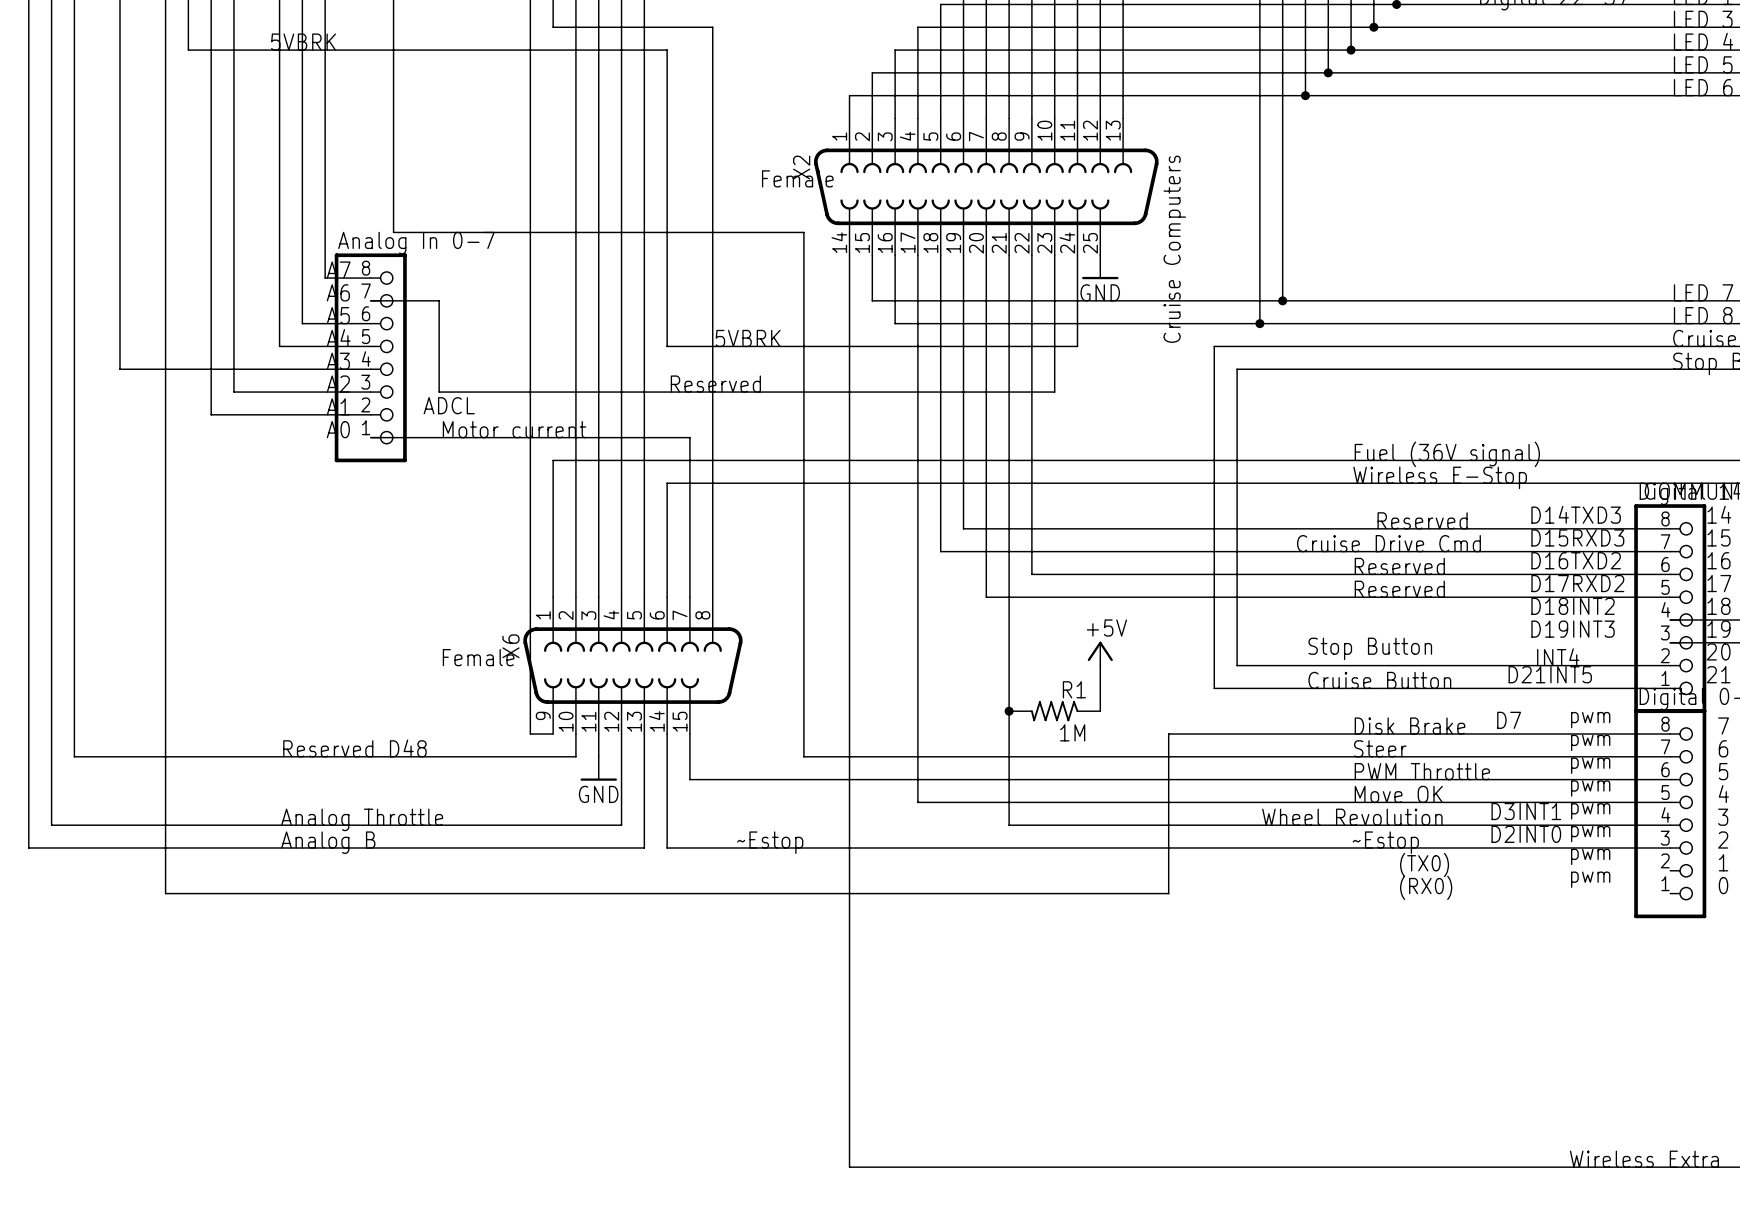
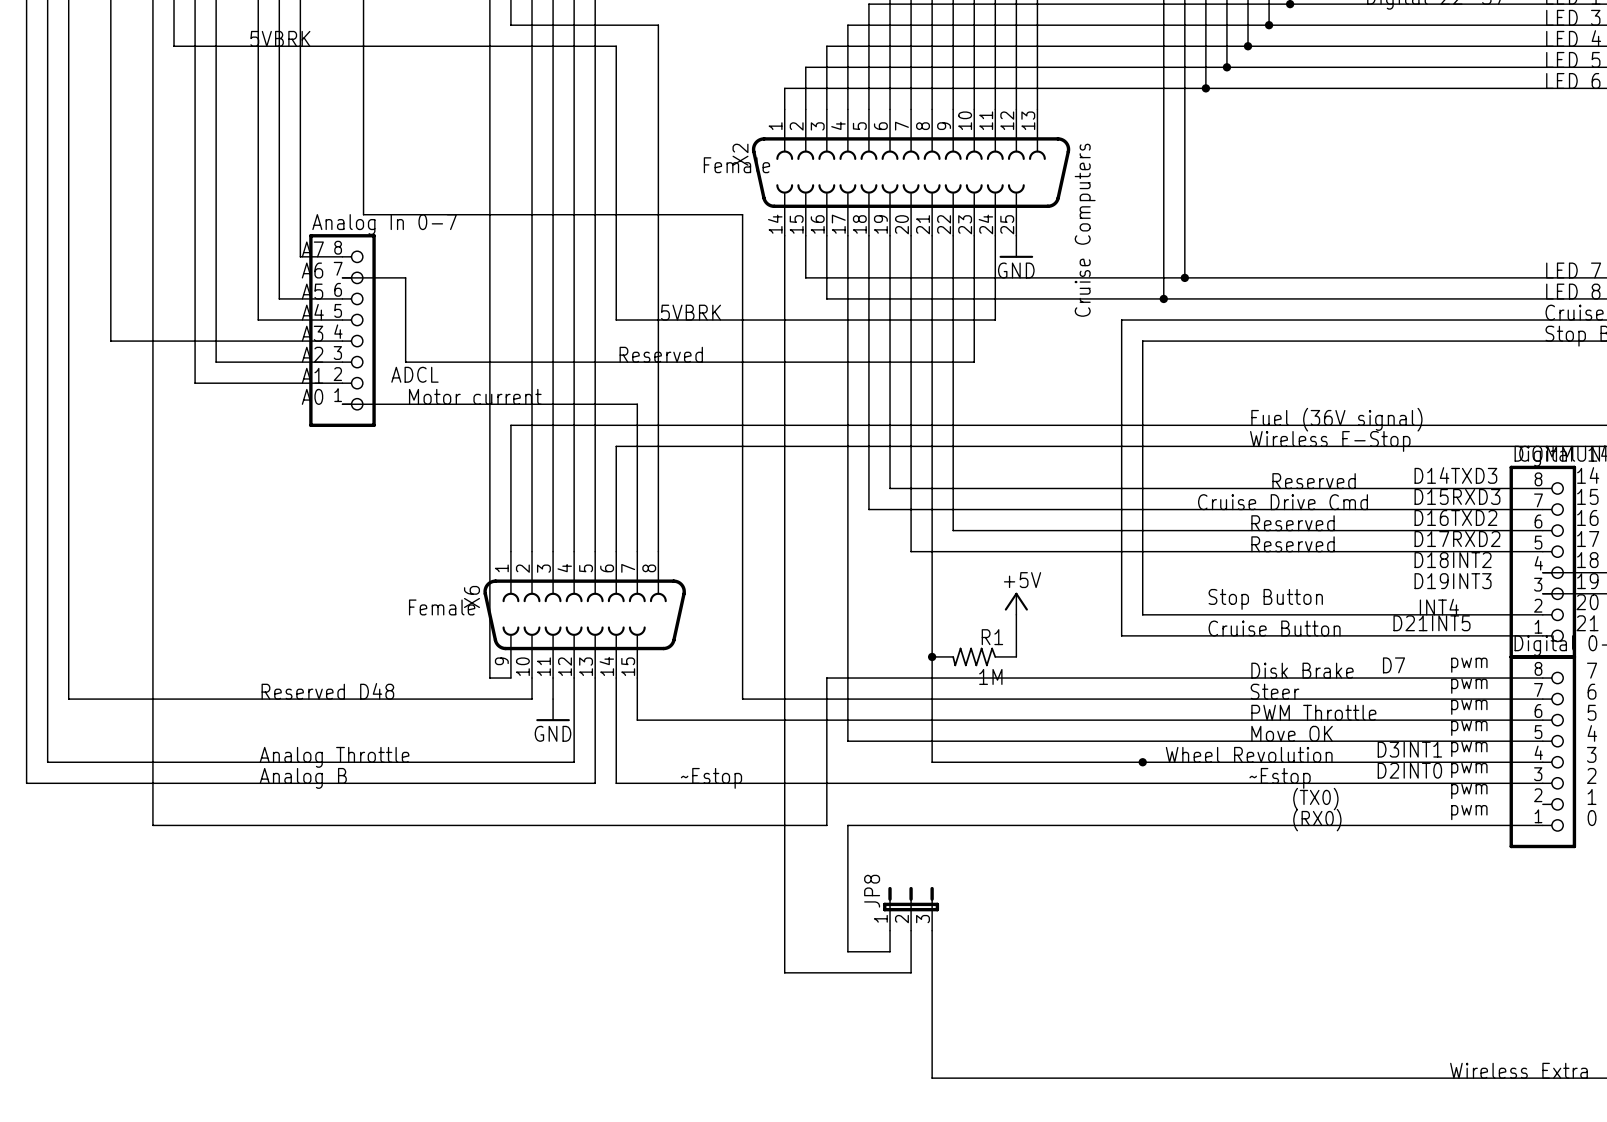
wire: (1168, 734) (1168, 893) -> (1079, 678) (826, 678) (826, 825)
junction: none -> (1142, 762)
wire: (895, 893) (917, 893) -> (890, 930) (890, 951) (847, 951) (847, 825)
wire: none -> (1079, 825) (1542, 825)
JP8: none -> (911, 908)
wire: none -> (932, 930) (932, 1078)
wire: (849, 1053) (849, 1167) (1009, 1167) -> (784, 972) (911, 972) (911, 930)

